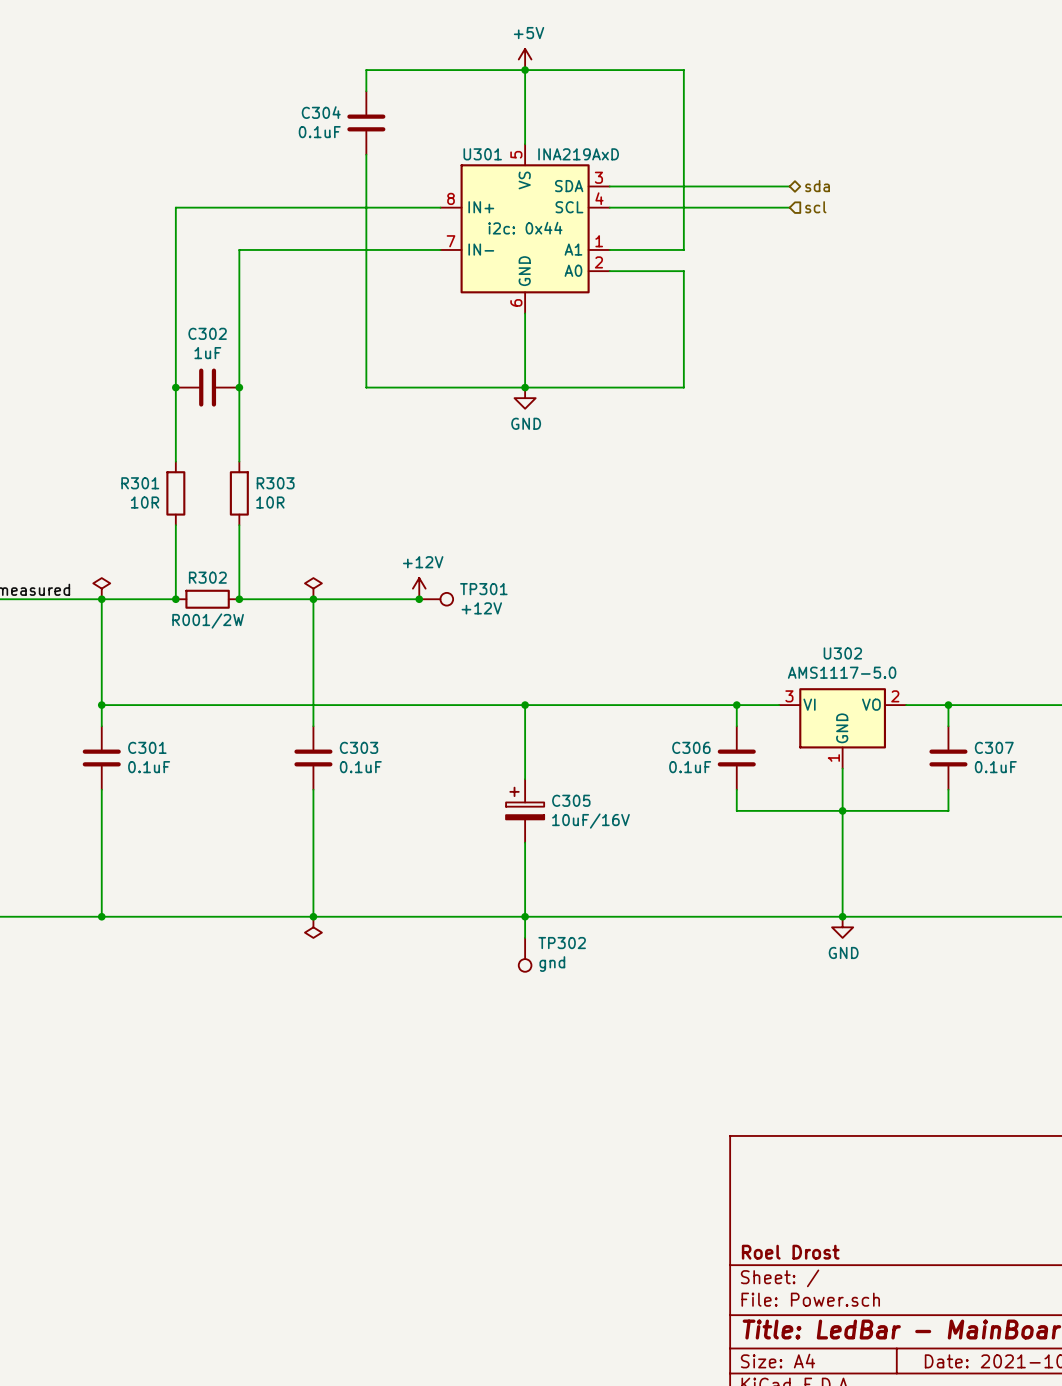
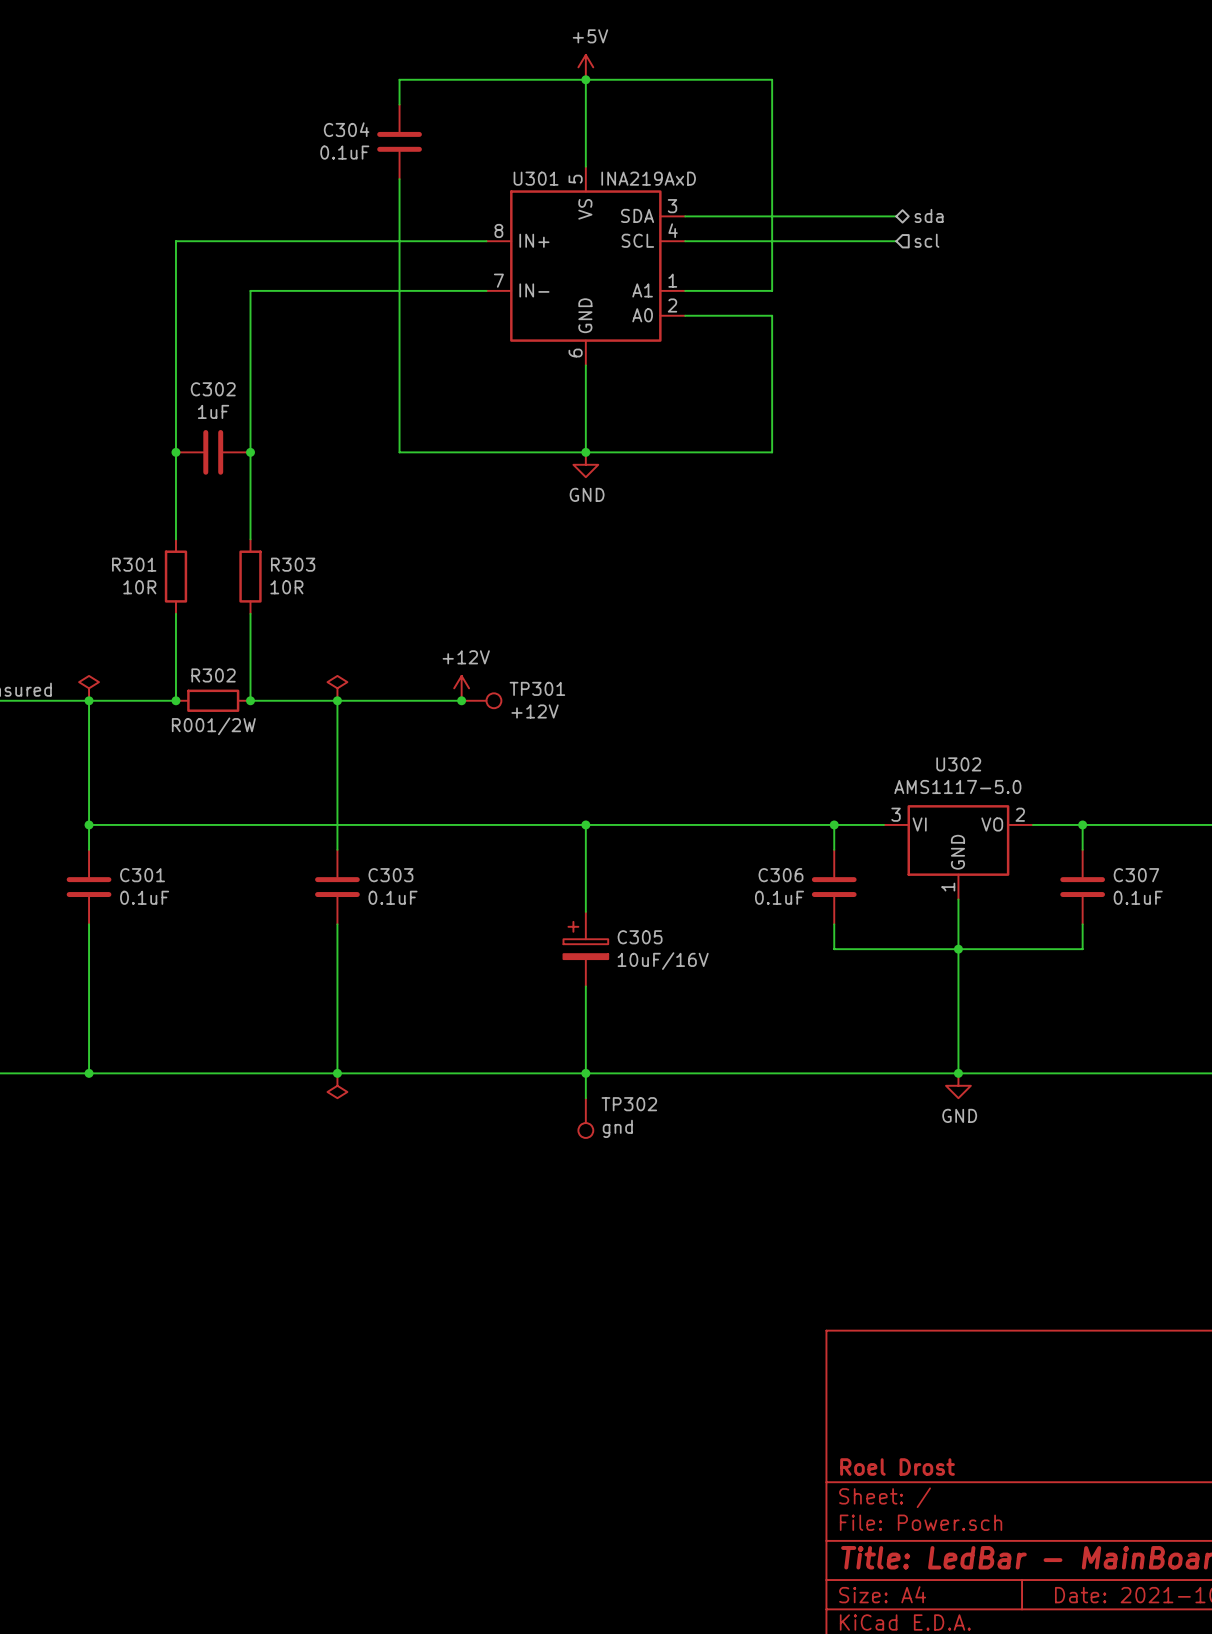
U301 text: i2c: 0x44 (525, 228) -> none

